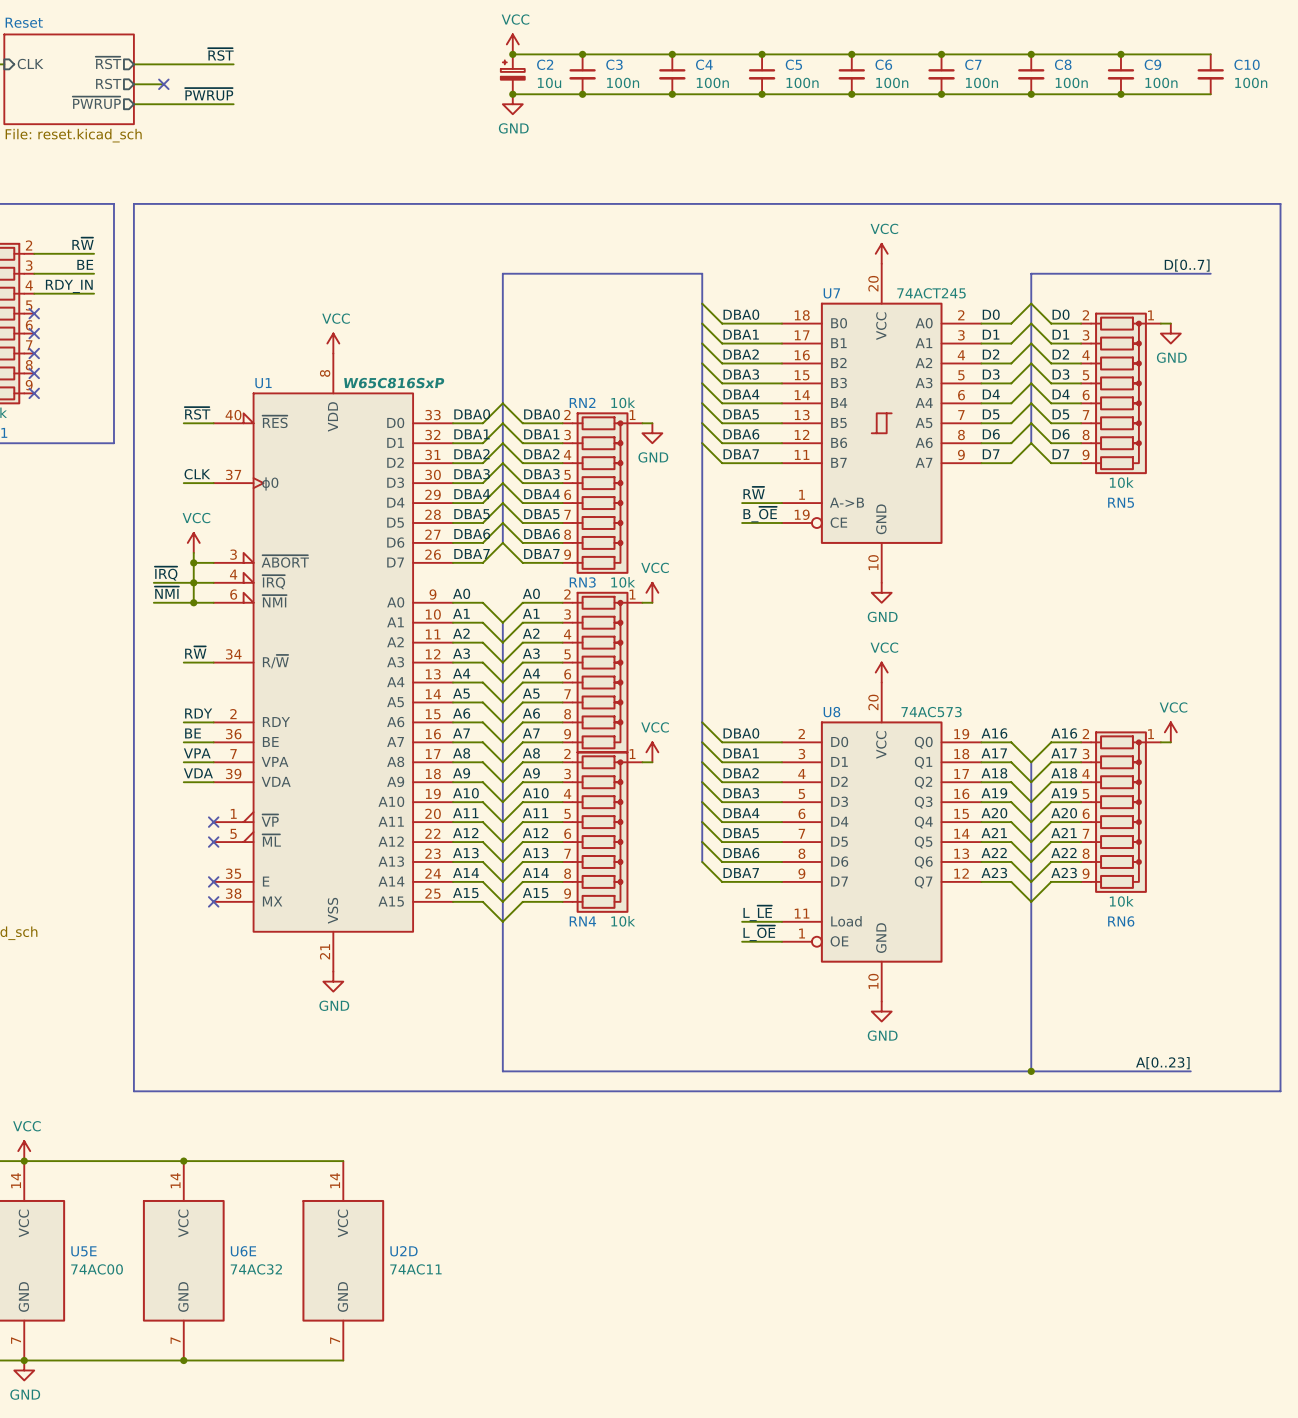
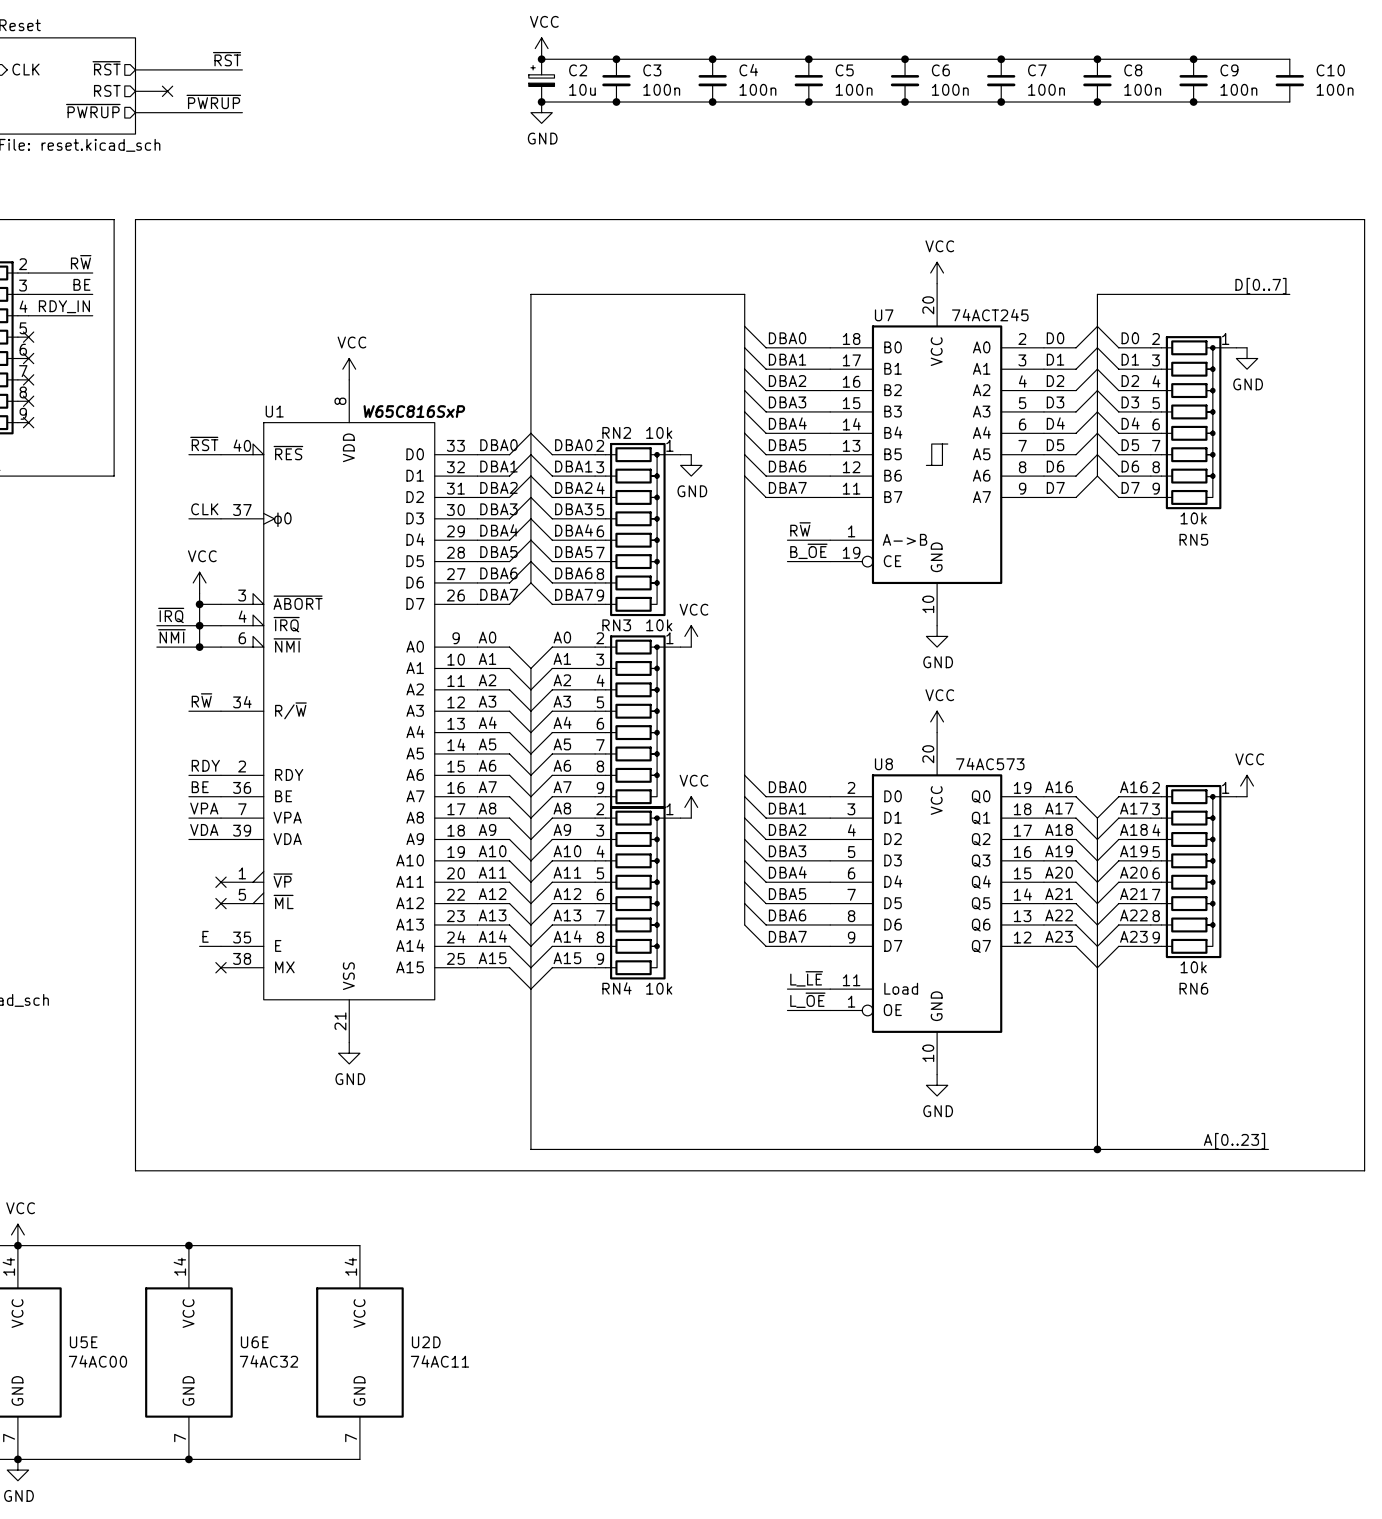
label: none -> E (205, 936)
wire: none -> (199, 946) (220, 946)
no-connect mark: (213, 881) -> none

